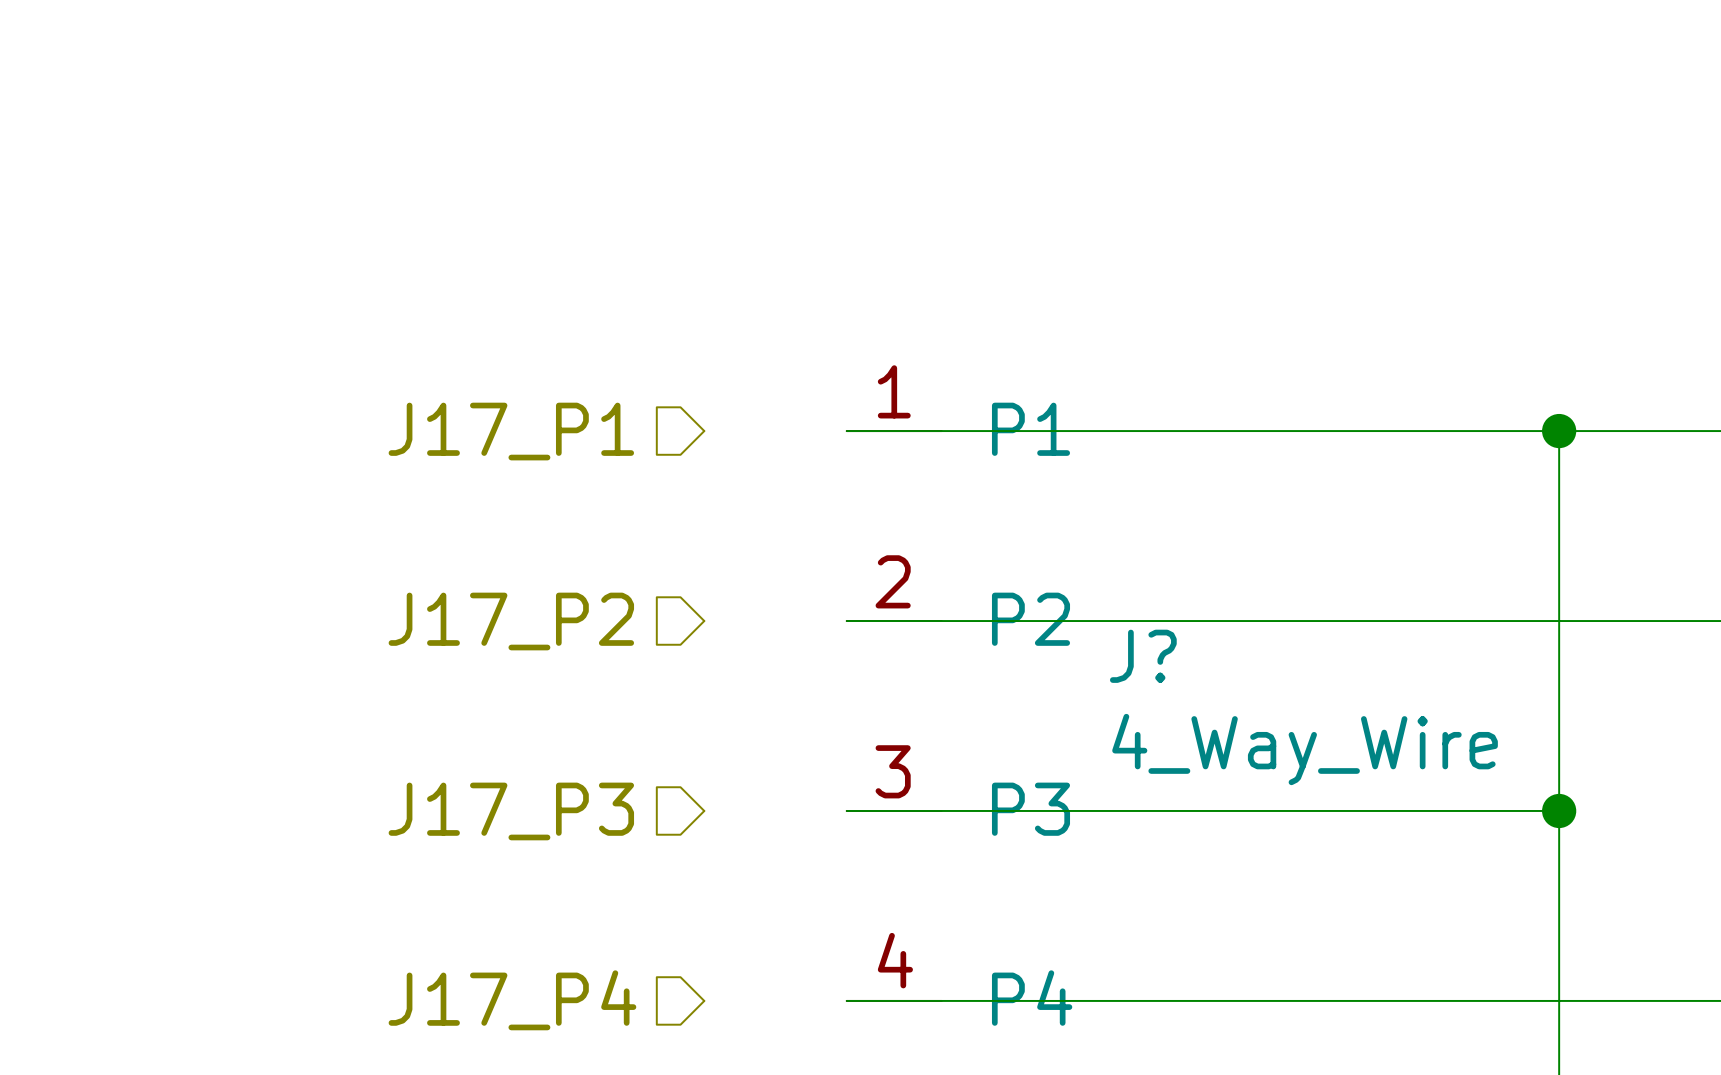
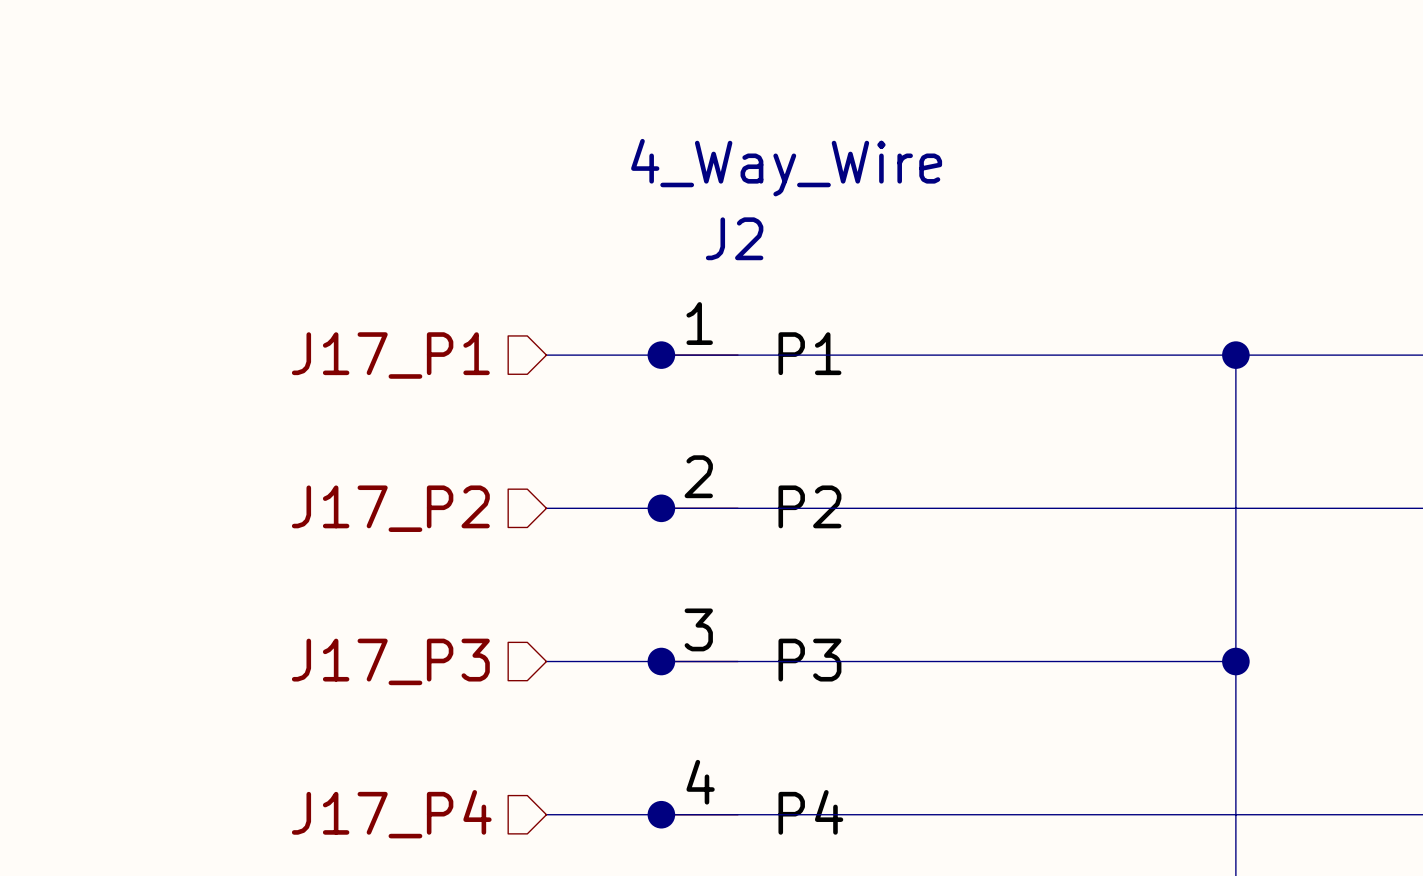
wire: none -> (546, 355) (661, 355)
junction: none -> (661, 355)
wire: none -> (546, 508) (661, 508)
junction: none -> (661, 508)
J? name: J? (1143, 656) -> J2 (734, 238)
J? value position: 4_Way_Wire (1305, 749) -> 4_Way_Wire (786, 167)
wire: none -> (546, 661) (661, 661)
junction: none -> (661, 661)
wire: none -> (546, 814) (661, 814)
junction: none -> (661, 814)

